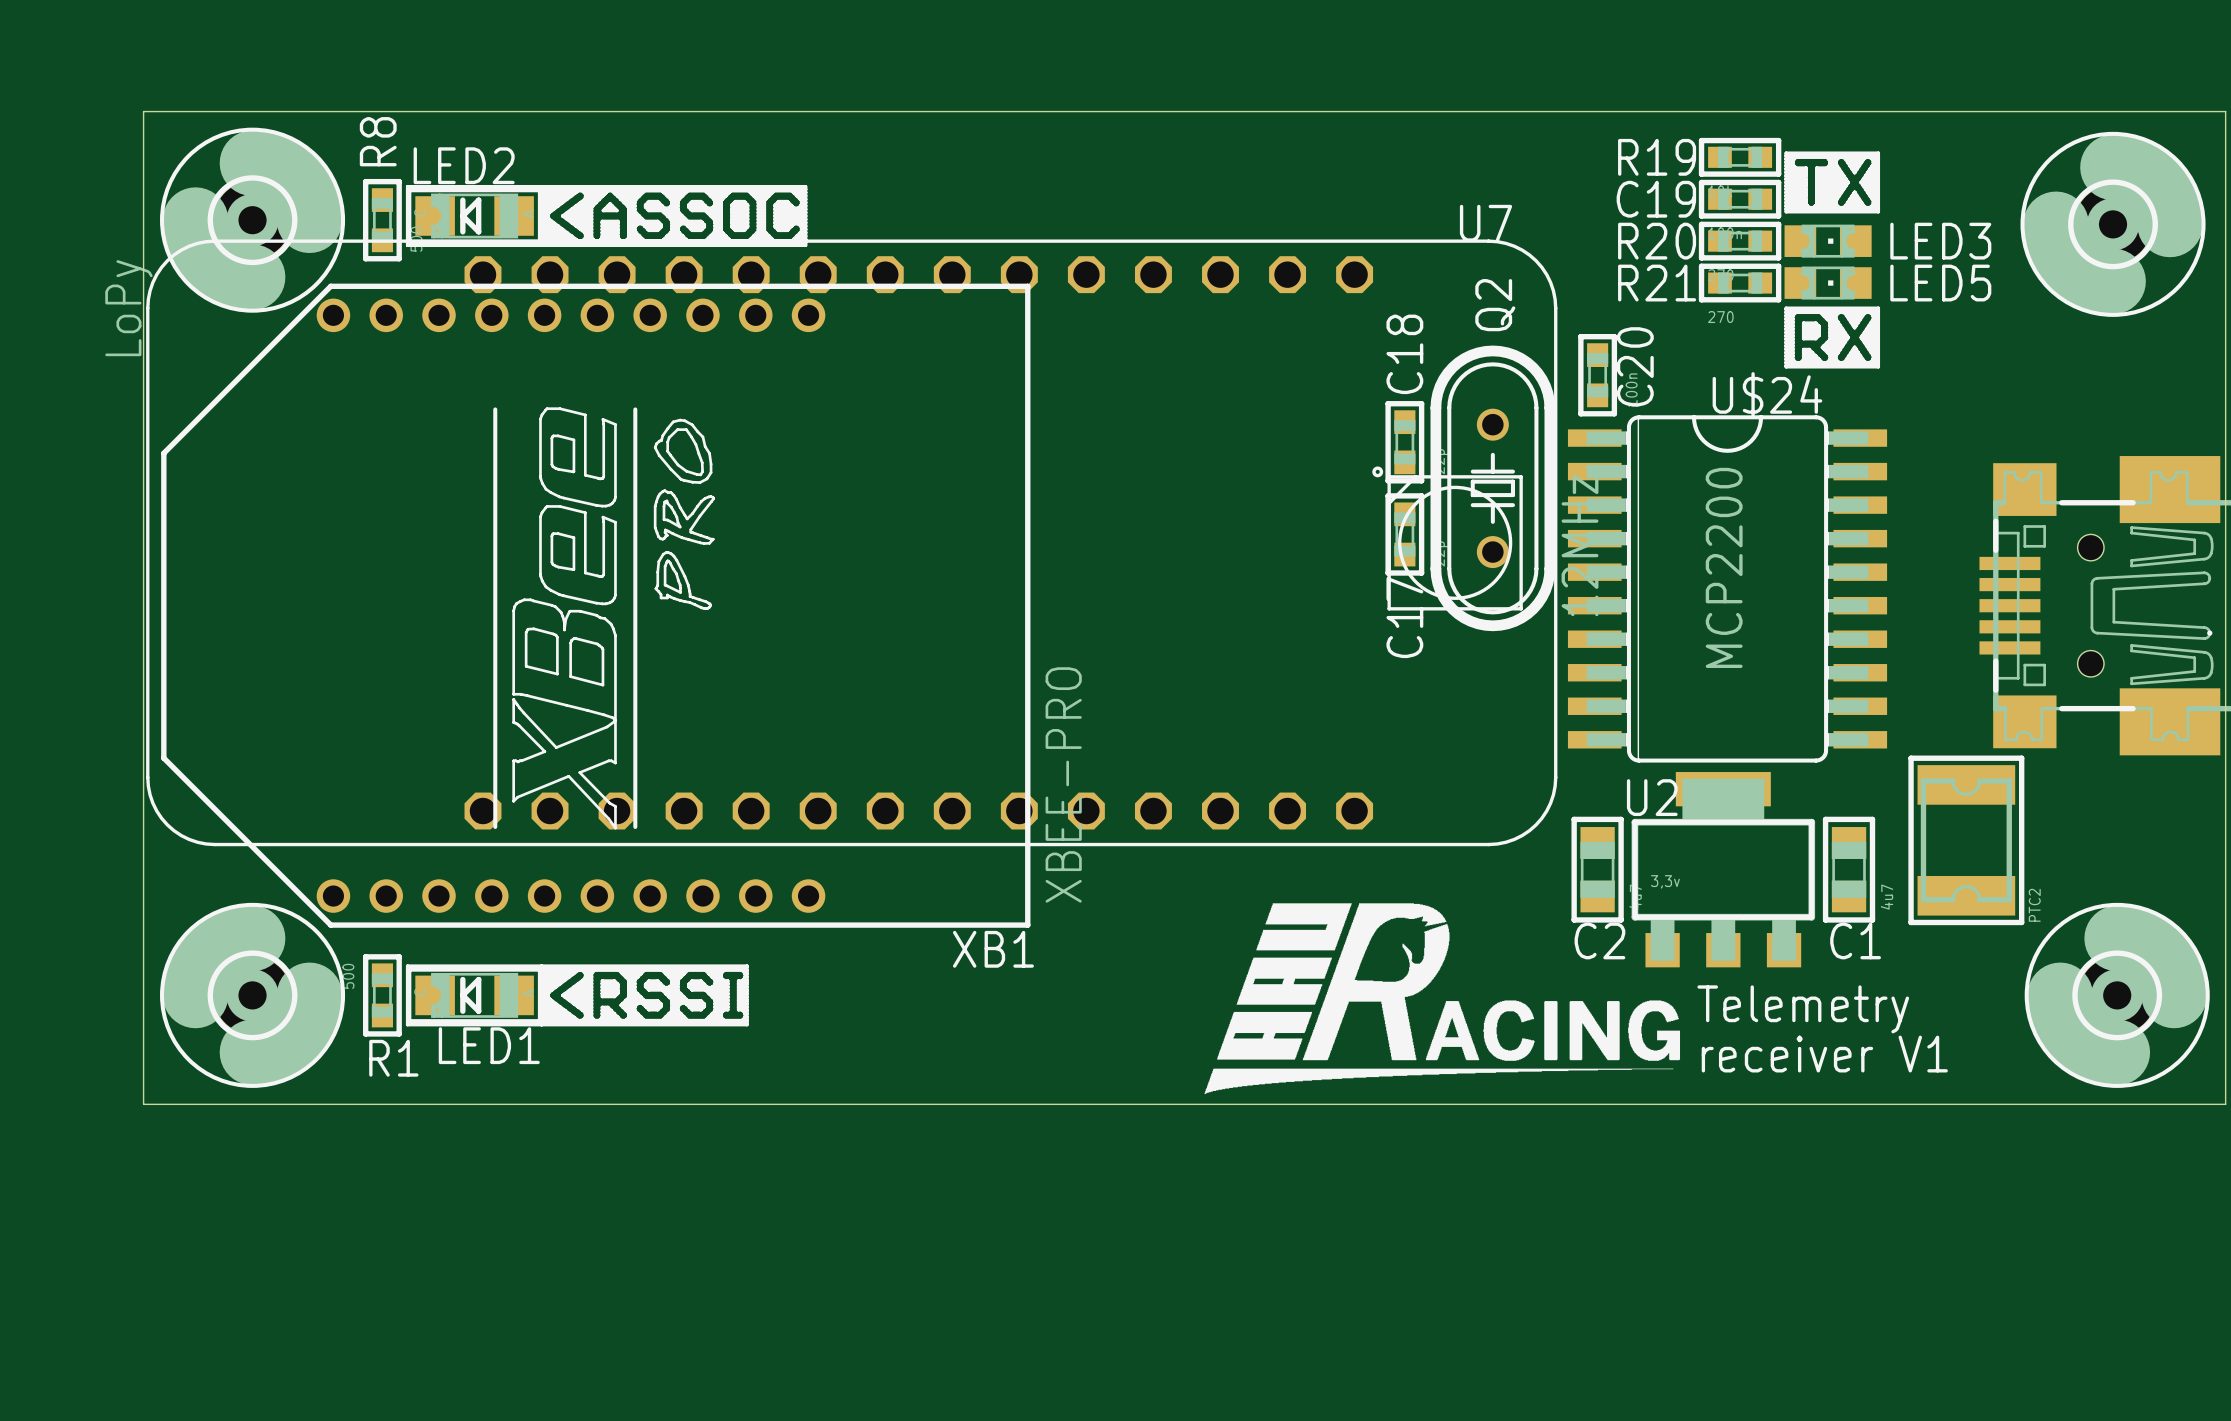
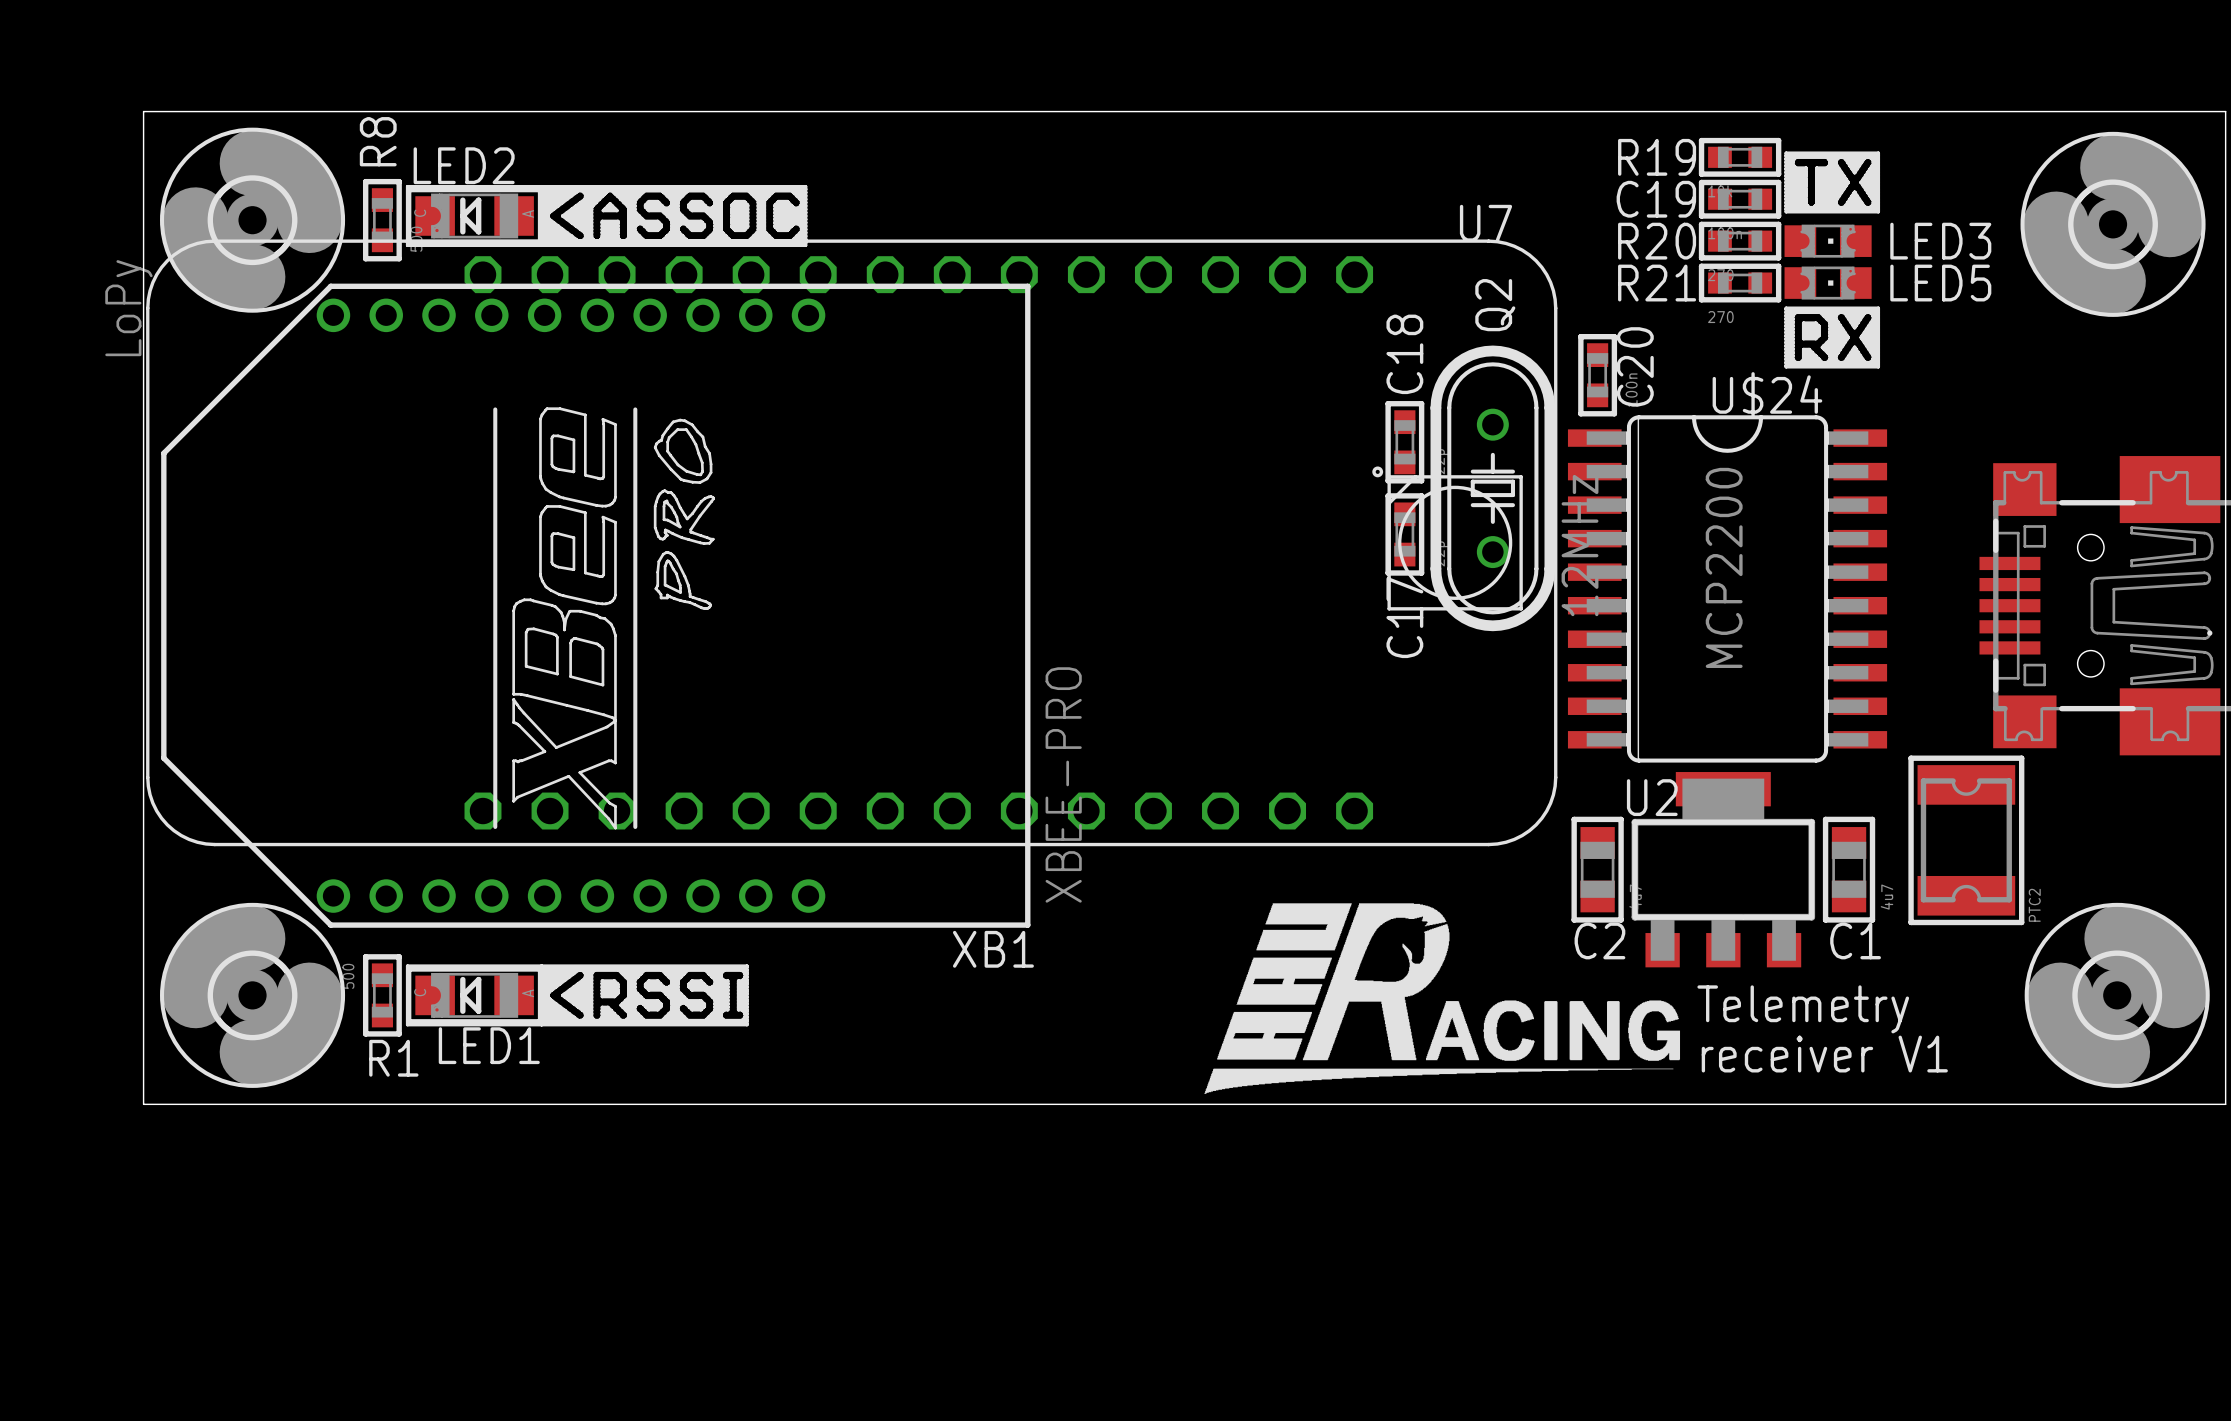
U2 value: 3,3v (1665, 881) -> none

